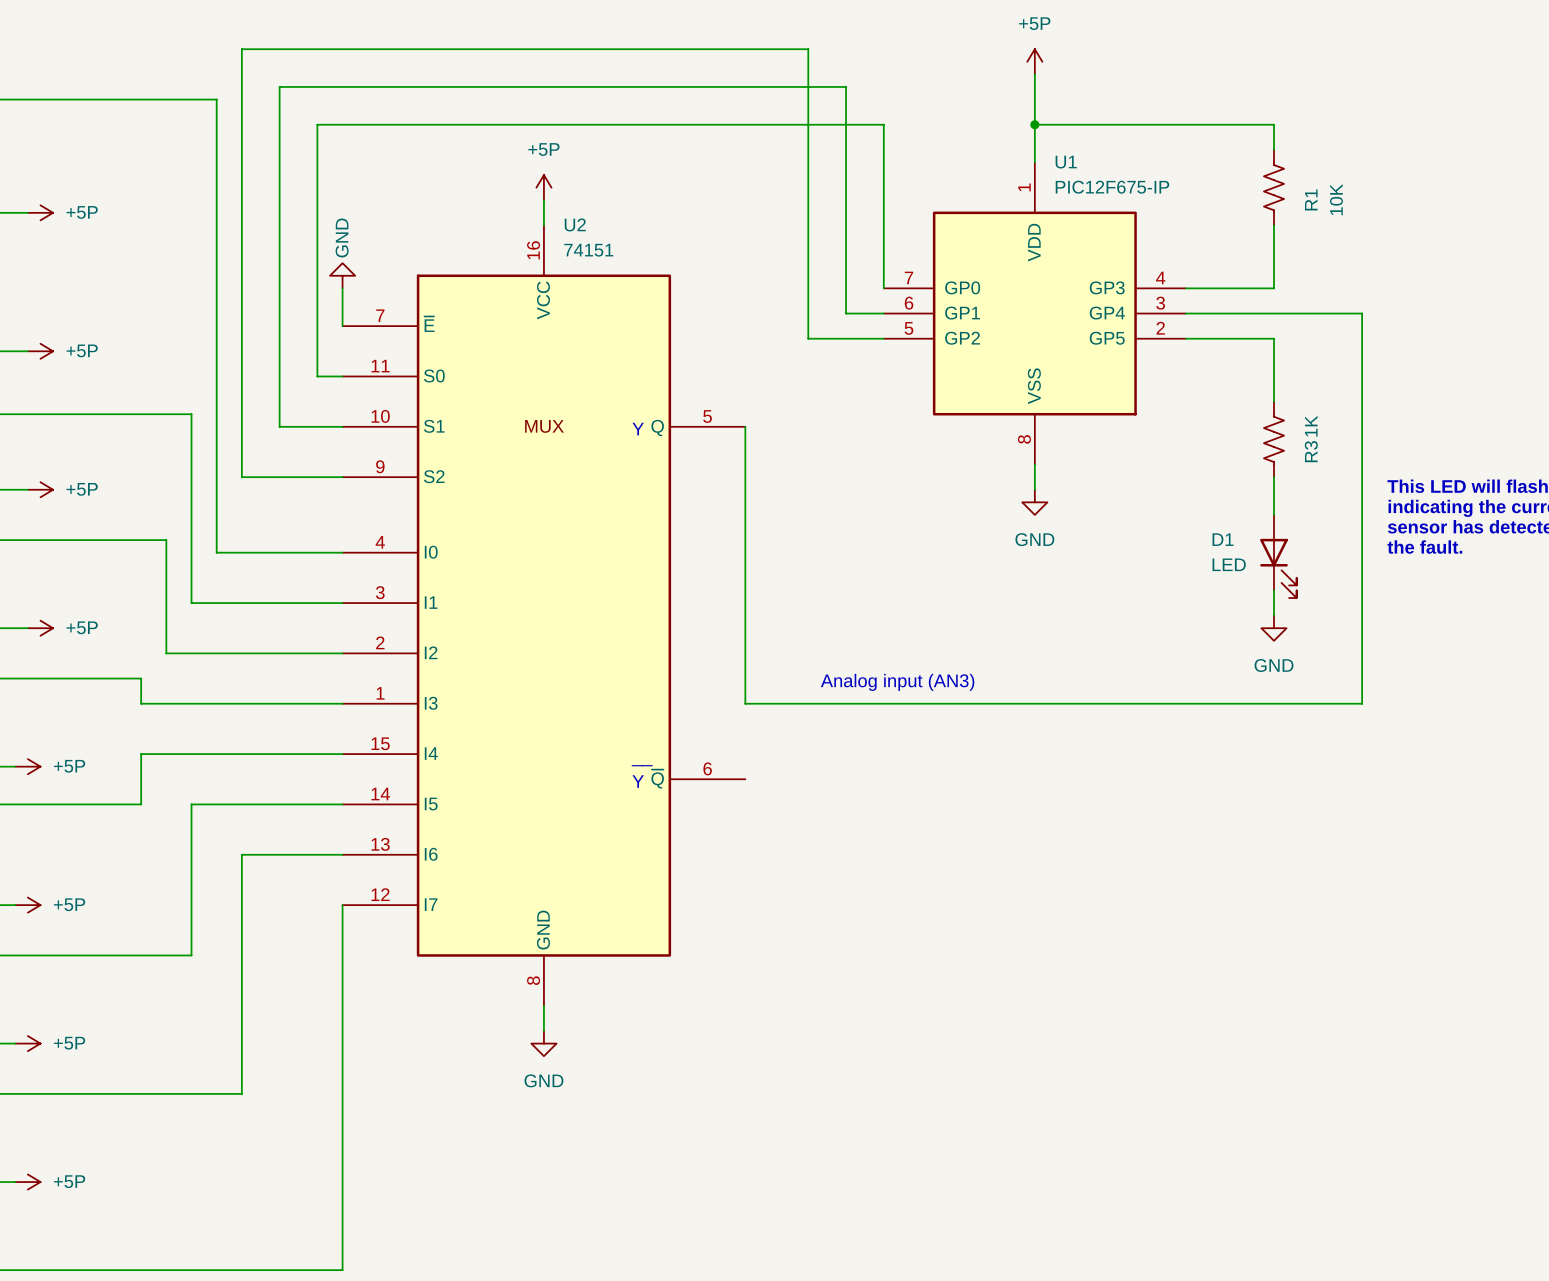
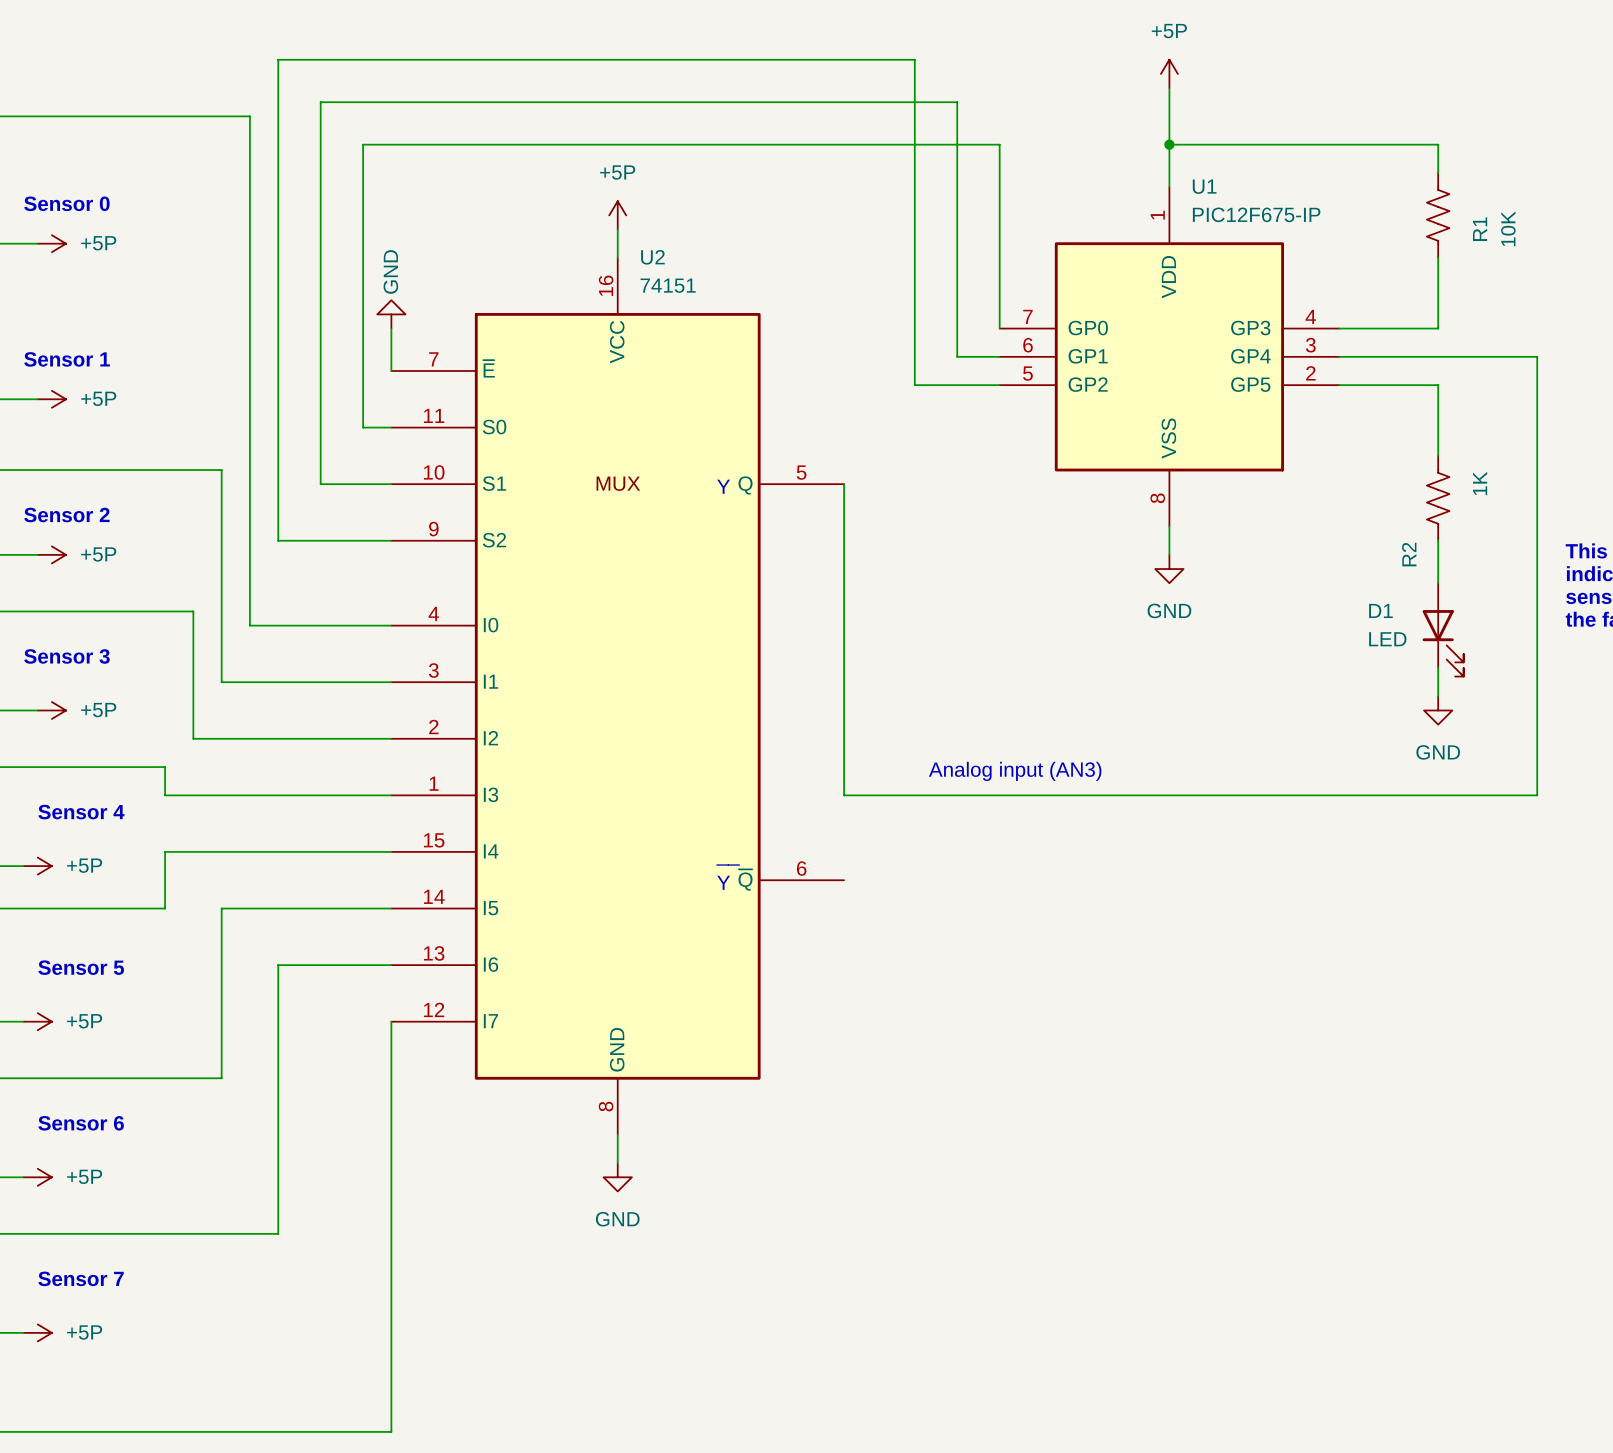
text: none -> Sensor 0 (66, 203)
text: none -> Sensor 1 (67, 359)
R3 name: R3 (1311, 451) -> R2 (1409, 554)
text: none -> Sensor 2 (66, 515)
text: none -> Sensor 3 (66, 656)
text: none -> Sensor 4 (81, 812)
text: none -> Sensor 5 (81, 967)
text: none -> Sensor 6 (81, 1123)
text: none -> Sensor 7 (81, 1278)

